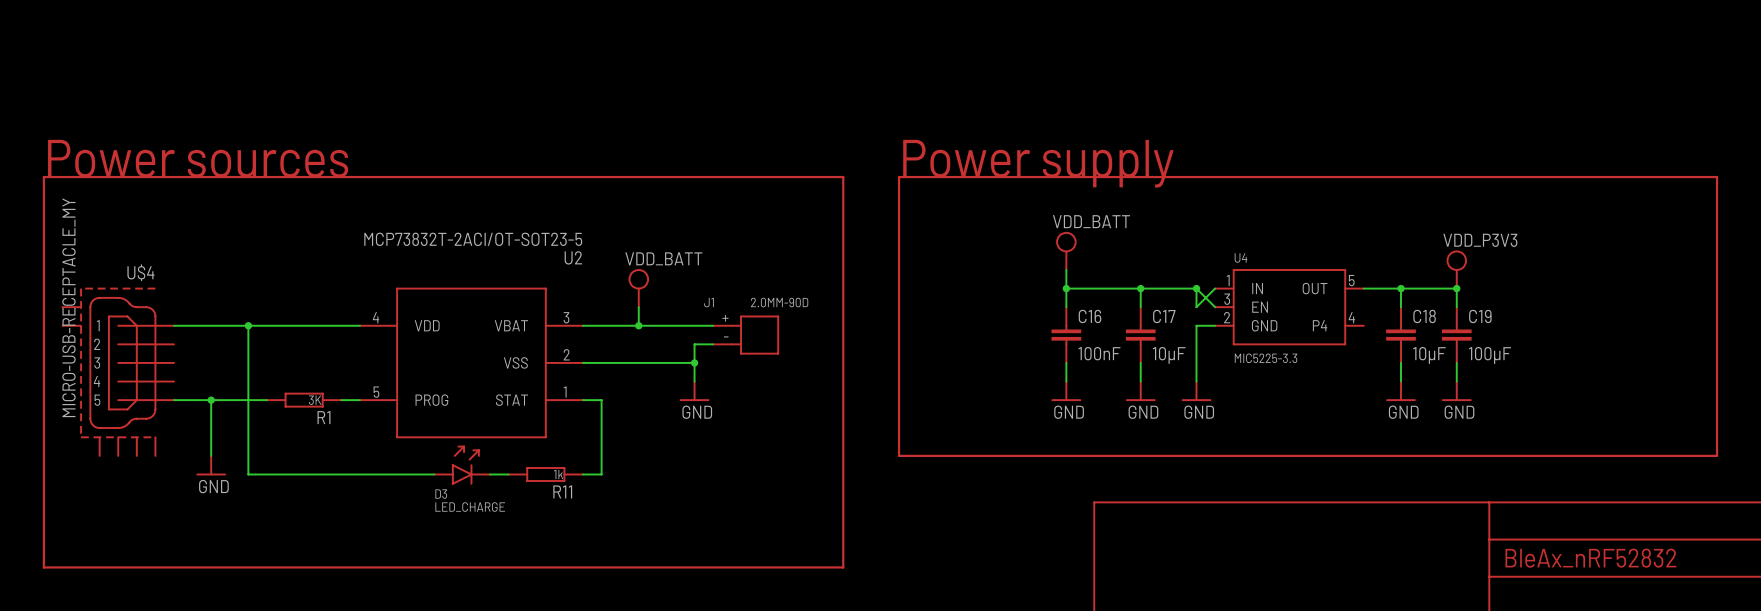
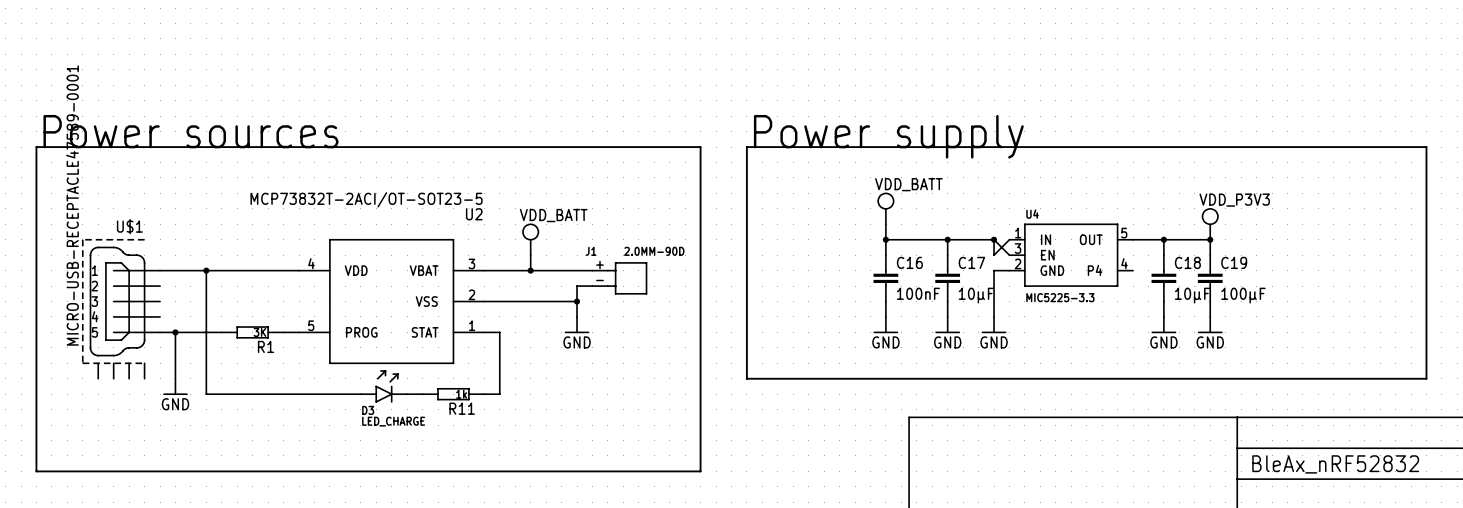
U$4: MICRO-USB-RECEPTACLE_MY (118, 371) -> none
U$1: none -> MICRO-USB-RECEPTACLE47589-0001 (121, 308)

